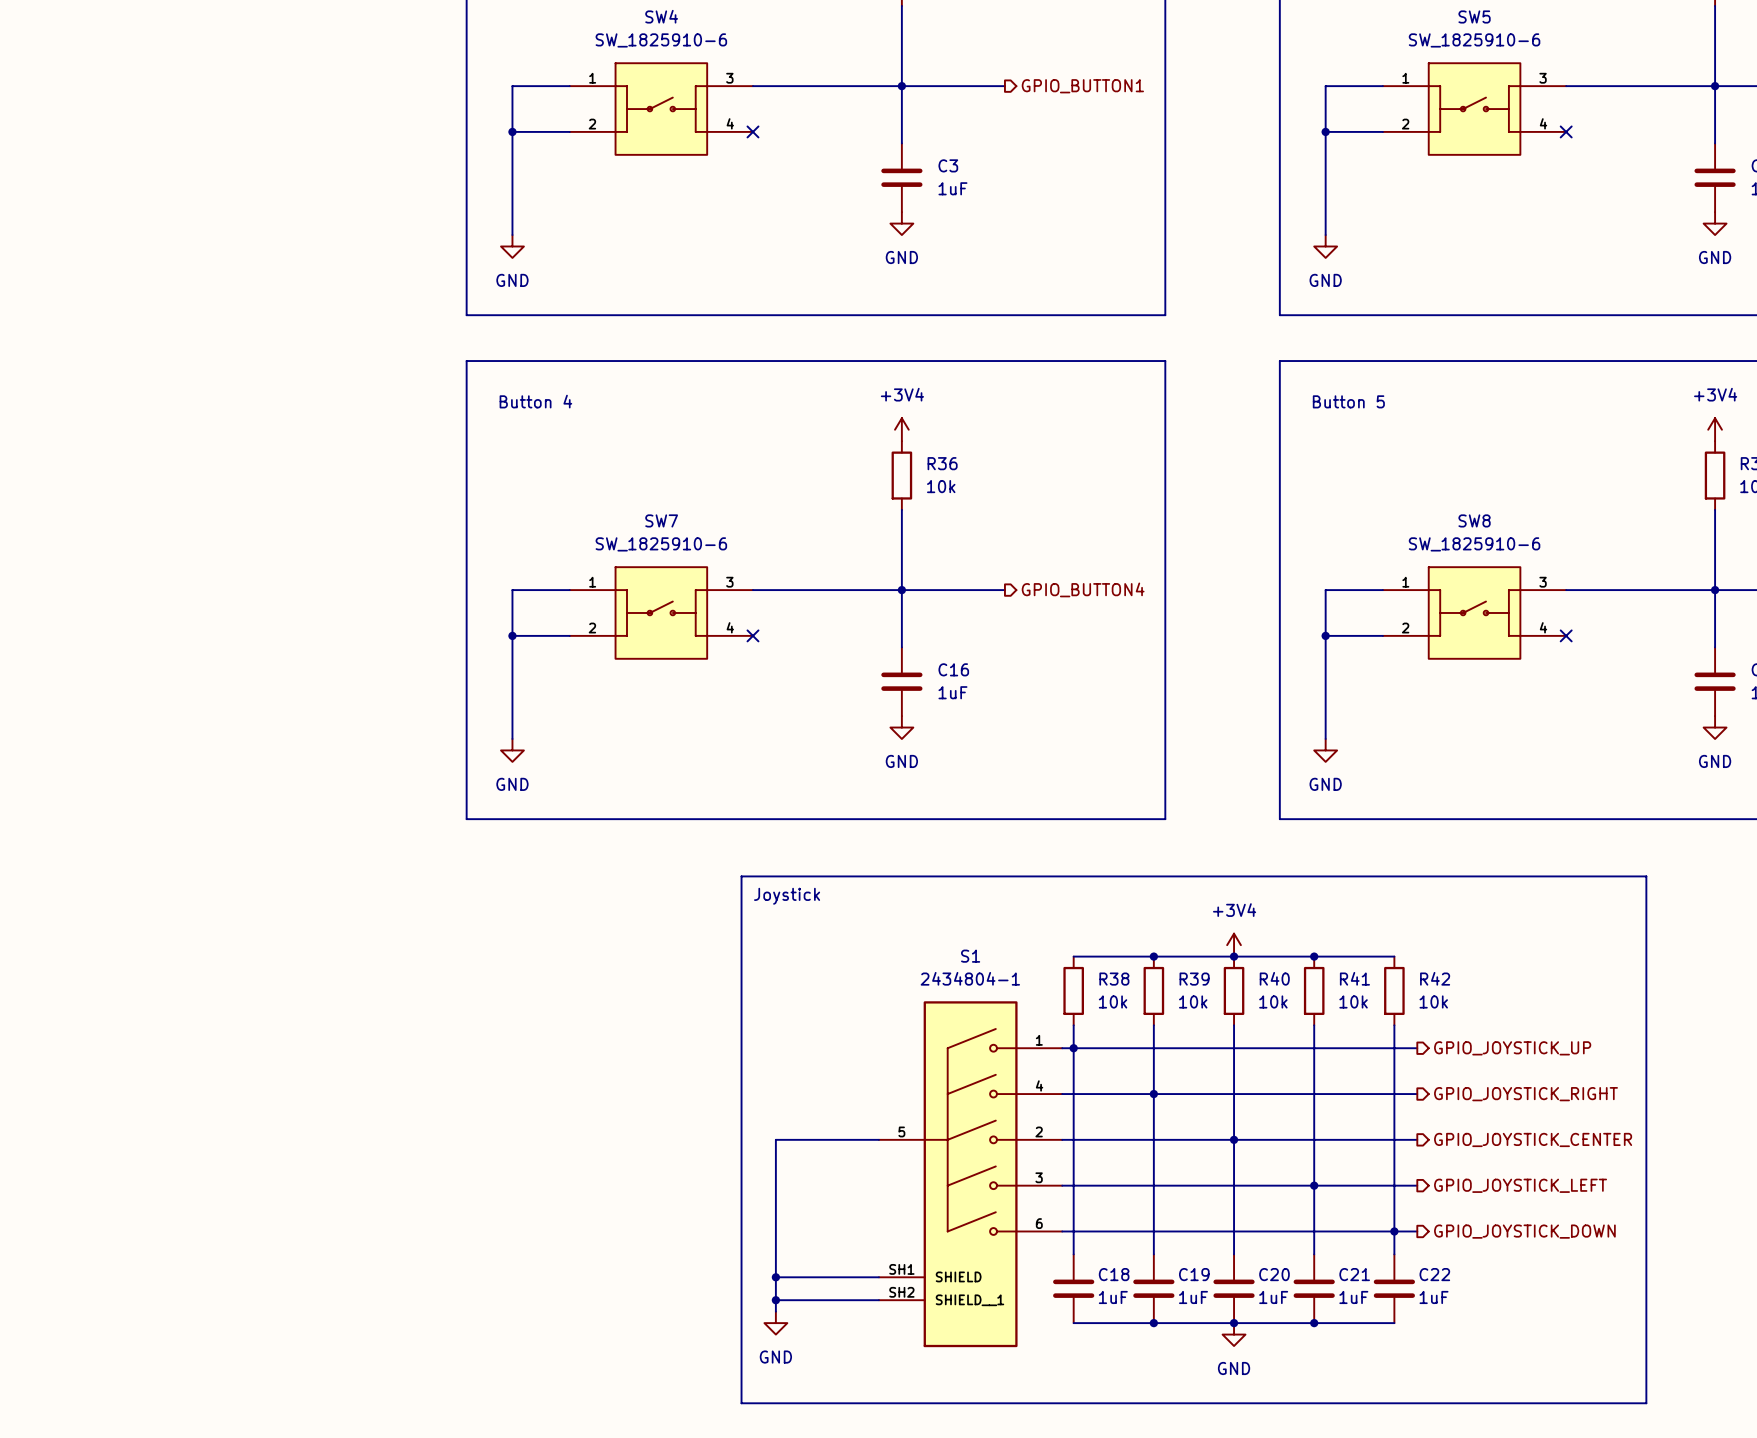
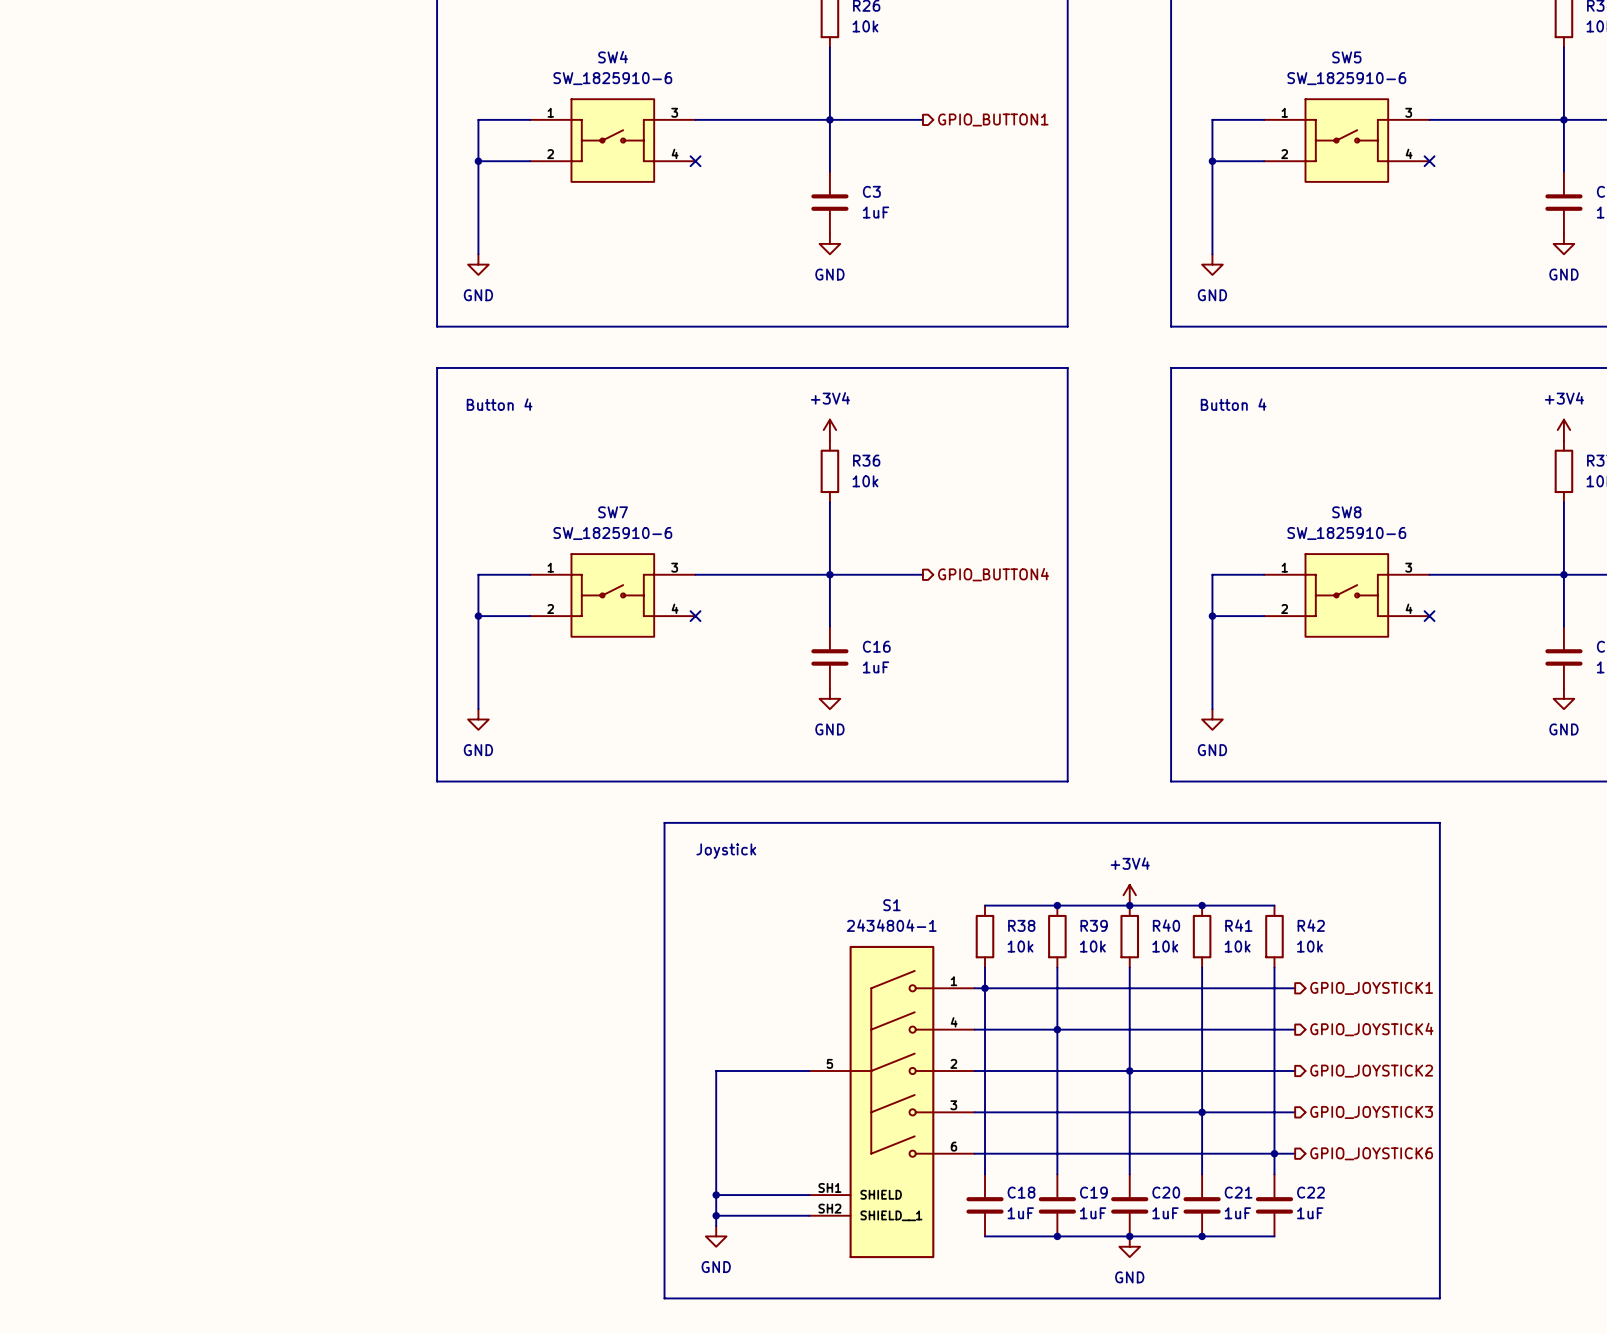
text: Button 5 (1348, 401) -> Button 4 (1233, 404)
line: (741, 876) (1646, 876) (1646, 1403) (741, 1403) (741, 876) -> (664, 822) (664, 1298) (1439, 1298) (1439, 822) (664, 822)
hierarchical label: GPIO_JOYSTICK_UP (1512, 1048) -> GPIO_JOYSTICK1 (1371, 988)
hierarchical label: GPIO_JOYSTICK_RIGHT (1526, 1094) -> GPIO_JOYSTICK4 (1371, 1029)
hierarchical label: GPIO_JOYSTICK_CENTER (1533, 1139) -> GPIO_JOYSTICK2 (1371, 1071)
hierarchical label: GPIO_JOYSTICK_LEFT (1520, 1185) -> GPIO_JOYSTICK3 (1371, 1112)
hierarchical label: GPIO_JOYSTICK_DOWN (1524, 1231) -> GPIO_JOYSTICK6 (1371, 1153)

